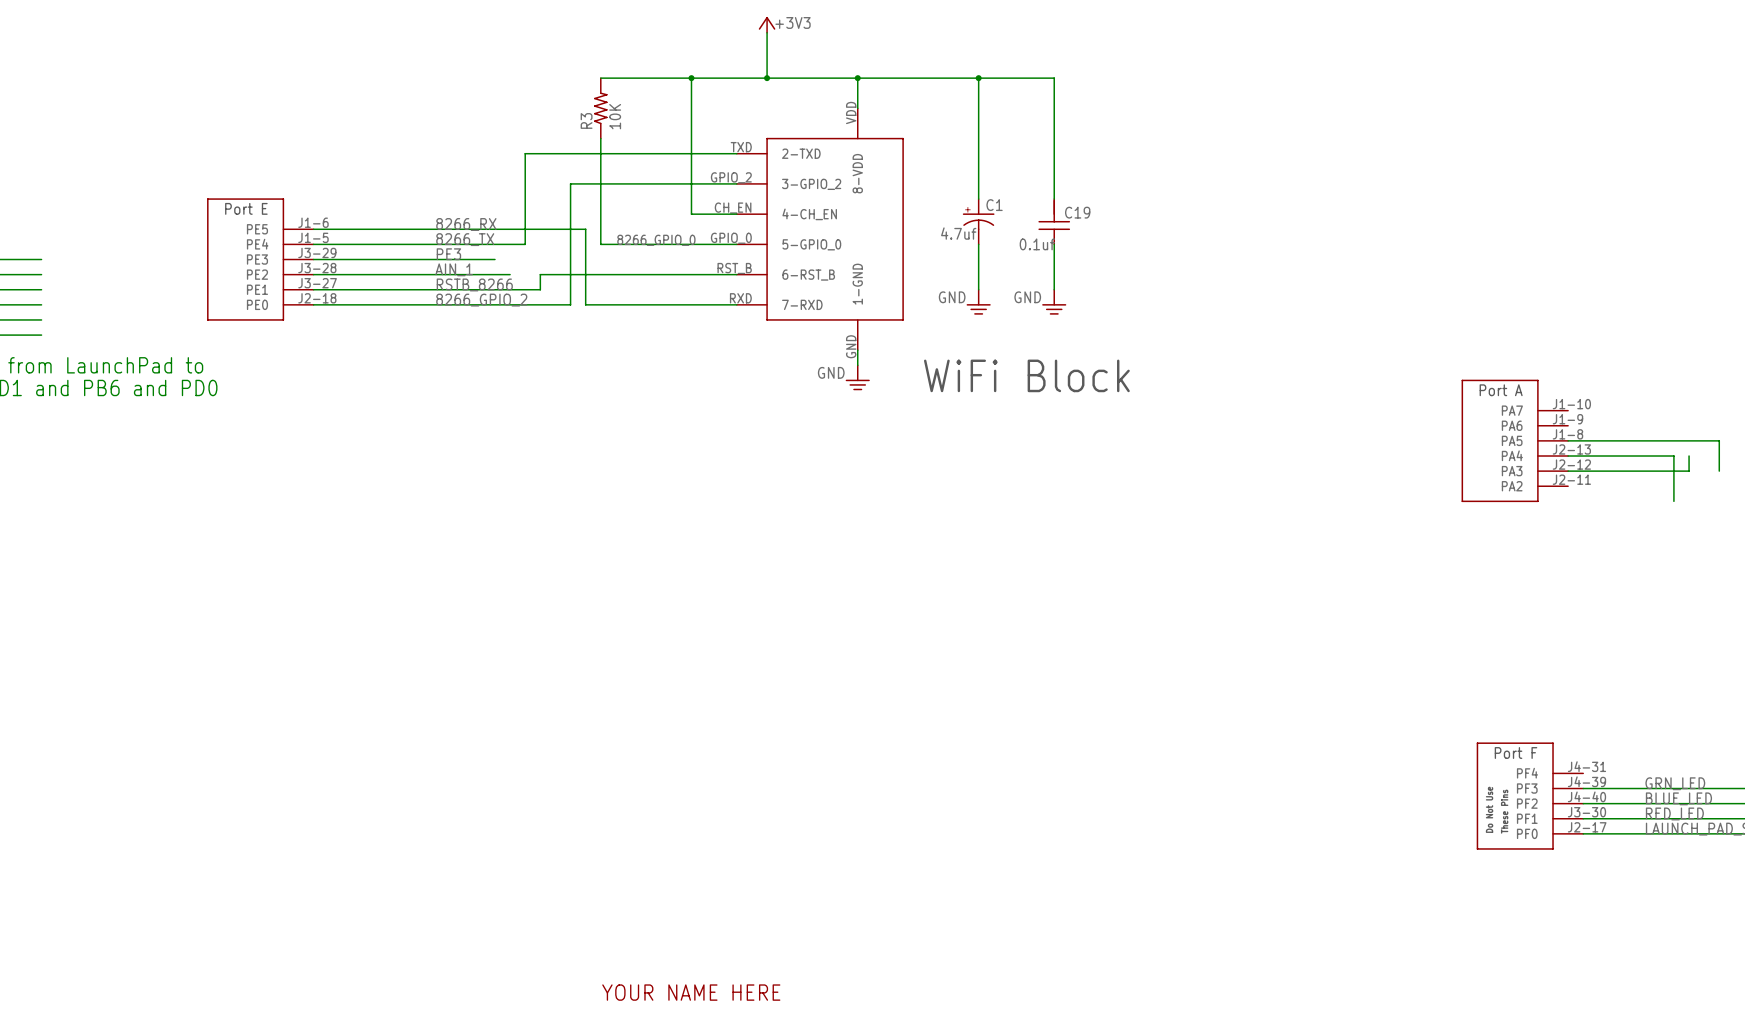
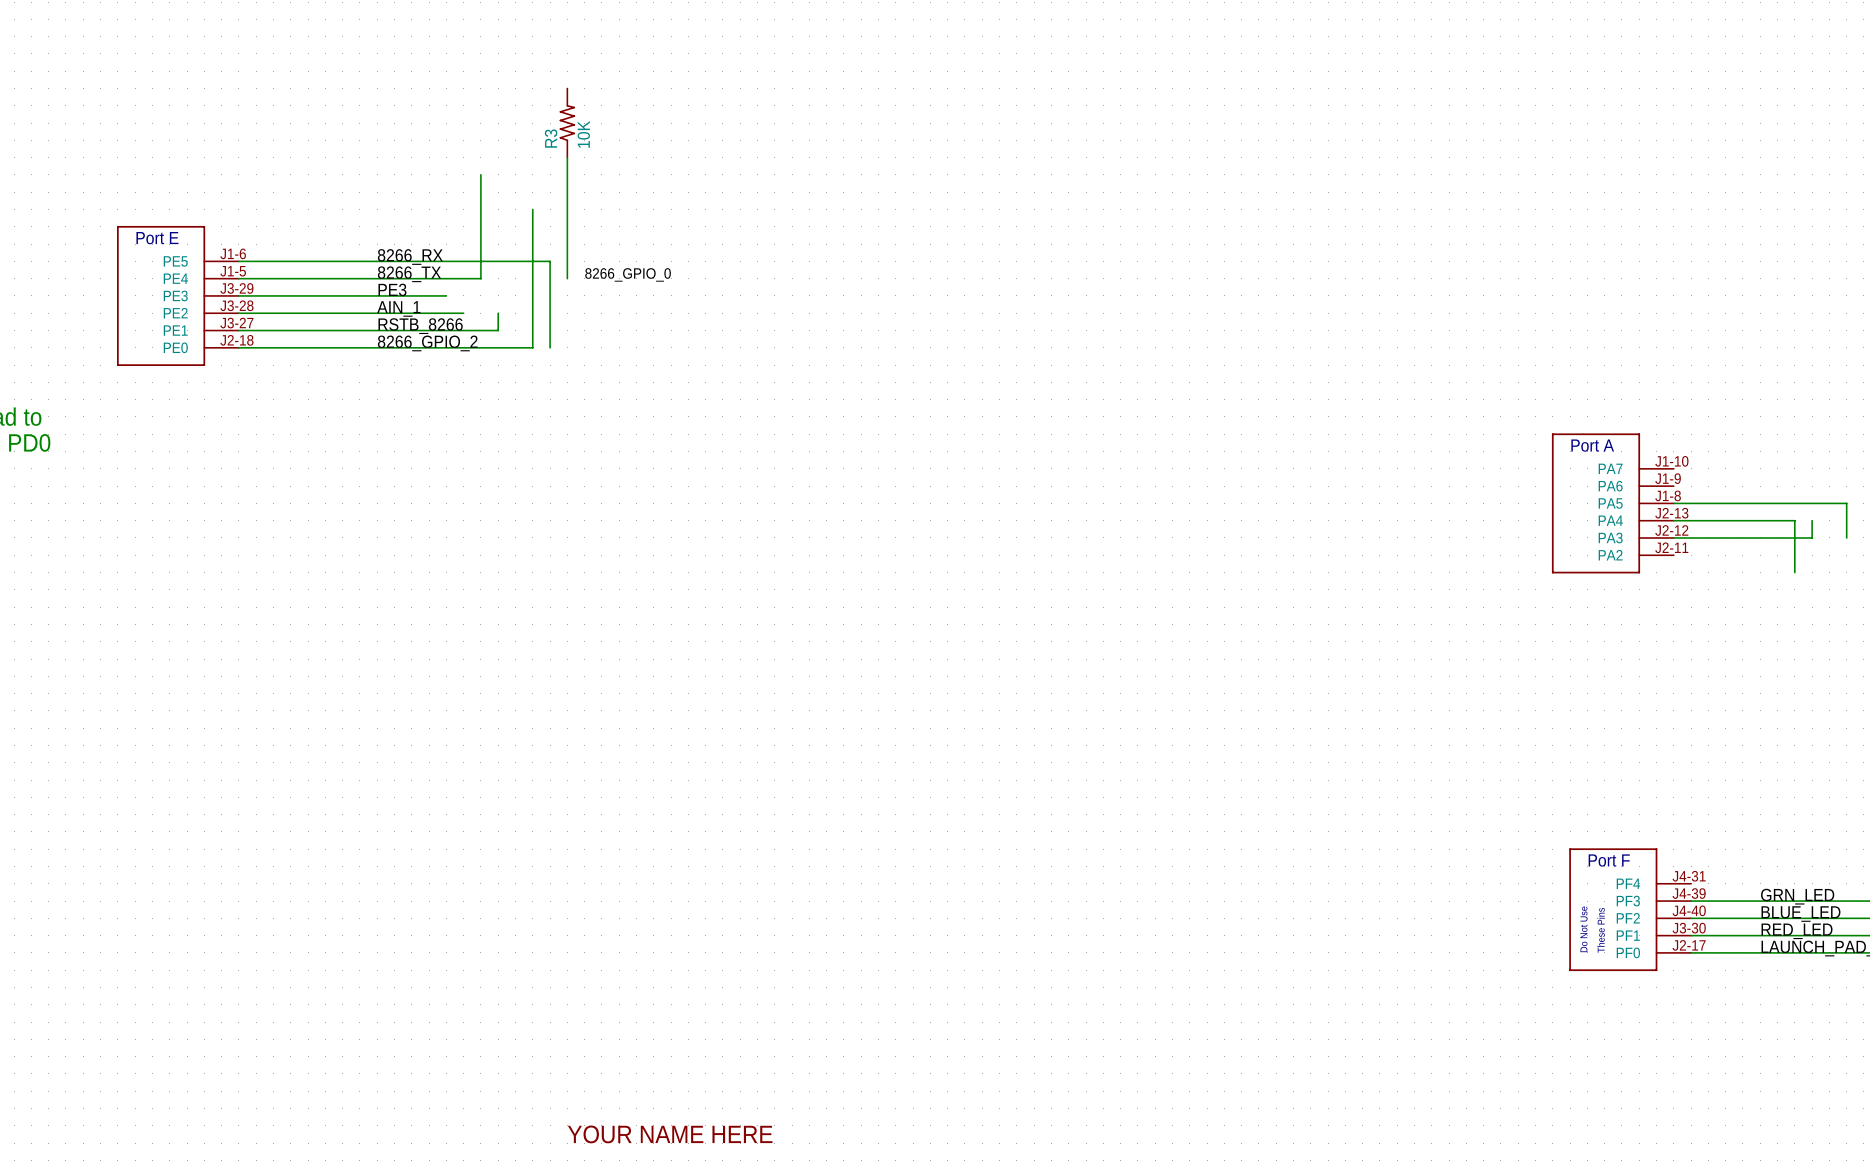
power symbol: +3V3 (767, 24) -> none
wire: (767, 32) (767, 78) -> none
wire: (600, 78) (1054, 78) (1054, 199) -> none
wire: (691, 78) (691, 214) (736, 214) -> none
junction: (691, 78) -> none
junction: (767, 78) -> none
wire: (857, 78) (857, 108) -> none
junction: (857, 78) -> none
wire: (978, 78) (978, 199) -> none
junction: (978, 78) -> none
wire: (525, 153) (736, 153) -> none
wire: (570, 183) (736, 183) -> none
C1: 4.7uf (978, 221) -> none
C19: 0.1uf (1054, 221) -> none
part: (820, 229) -> none
wire: (600, 244) (736, 244) -> none
wire: (978, 244) (978, 289) -> none
wire: (1054, 244) (1054, 289) -> none
wire: (540, 274) (736, 274) -> none
power symbol: GND (978, 302) -> none
power symbol: GND (1054, 302) -> none
wire: (585, 304) (736, 304) -> none
wire: (857, 350) (857, 365) -> none
text: WiFi Block (1026, 375) -> none
power symbol: GND (857, 377) -> none

